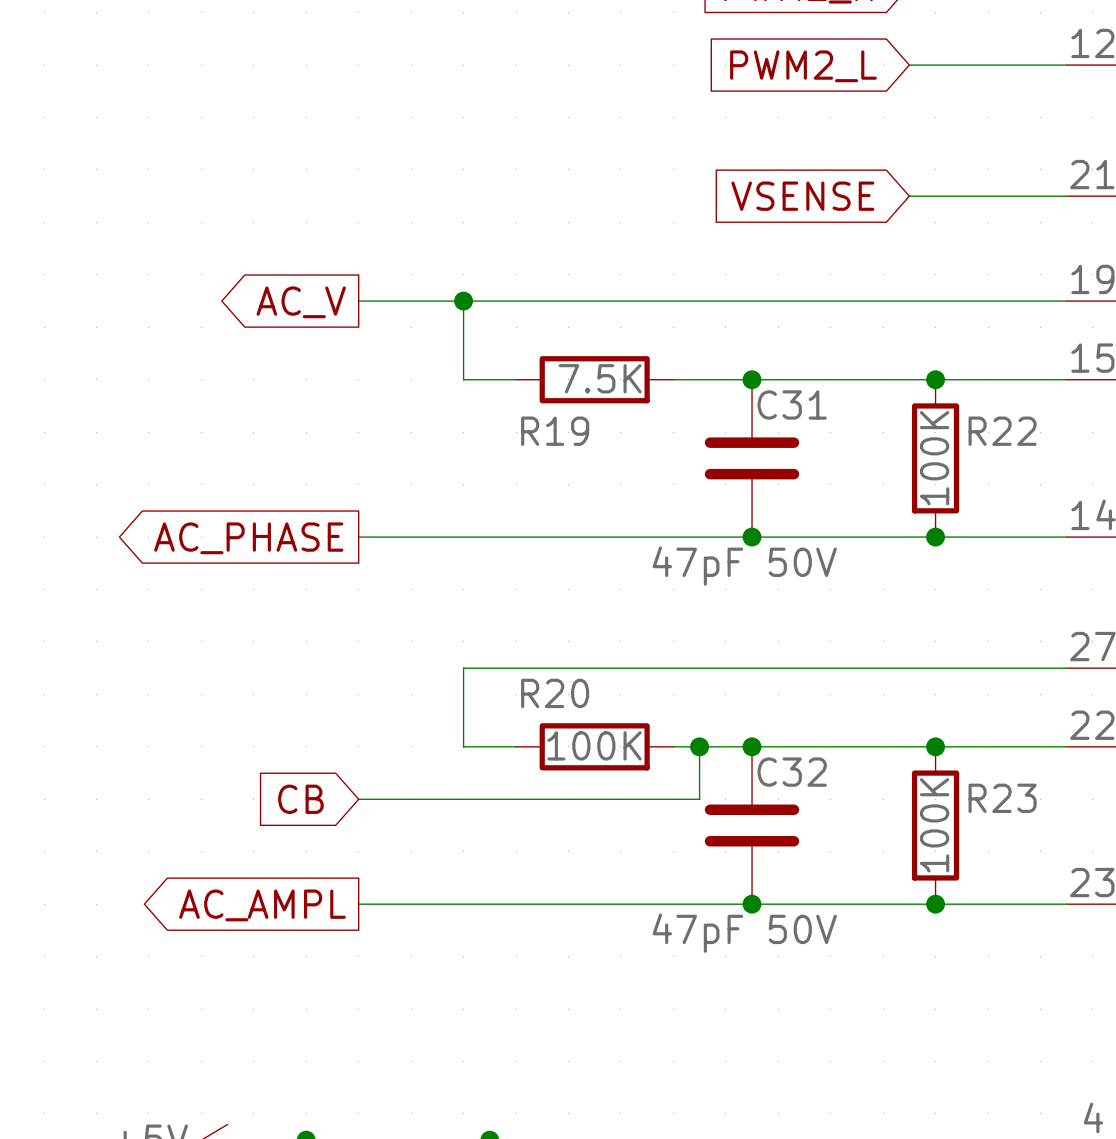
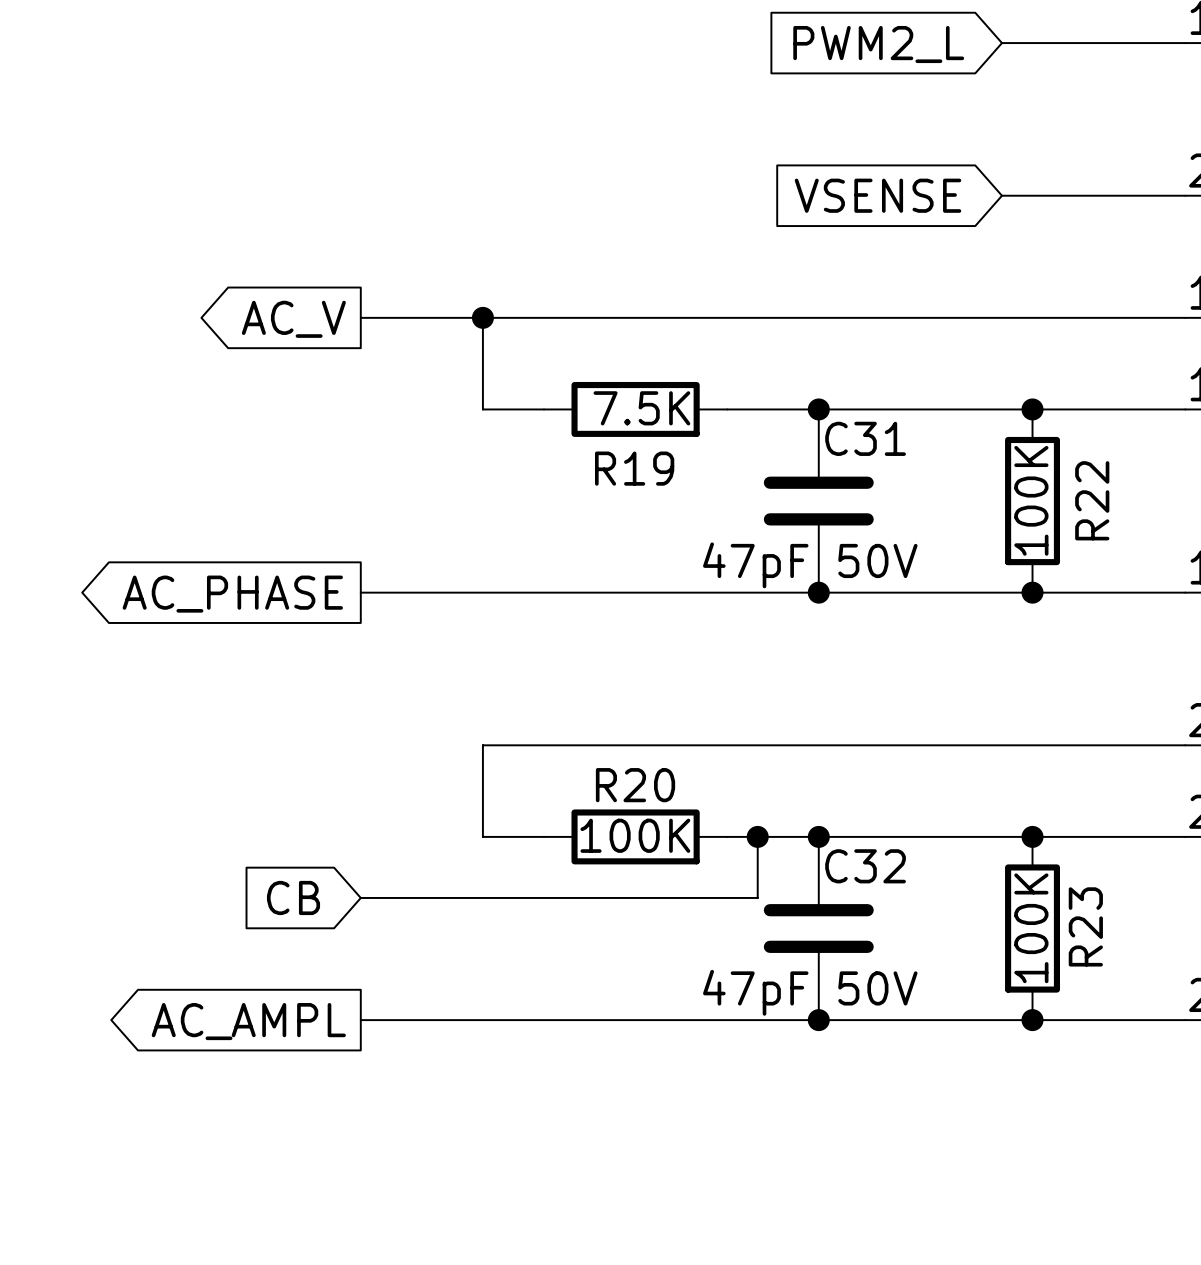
R19 name position: R19 (555, 431) -> R19 (634, 468)
R22 name rotation: 0° (1002, 431) -> 90° counterclockwise (1092, 500)
C31 value position: 47pF 50V (744, 566) -> 47pF 50V (810, 565)
R20 name position: R20 (555, 693) -> R20 (635, 785)
R23 name rotation: 0° (1002, 798) -> 90° counterclockwise (1085, 926)
C32 value position: 47pF 50V (744, 933) -> 47pF 50V (810, 992)

